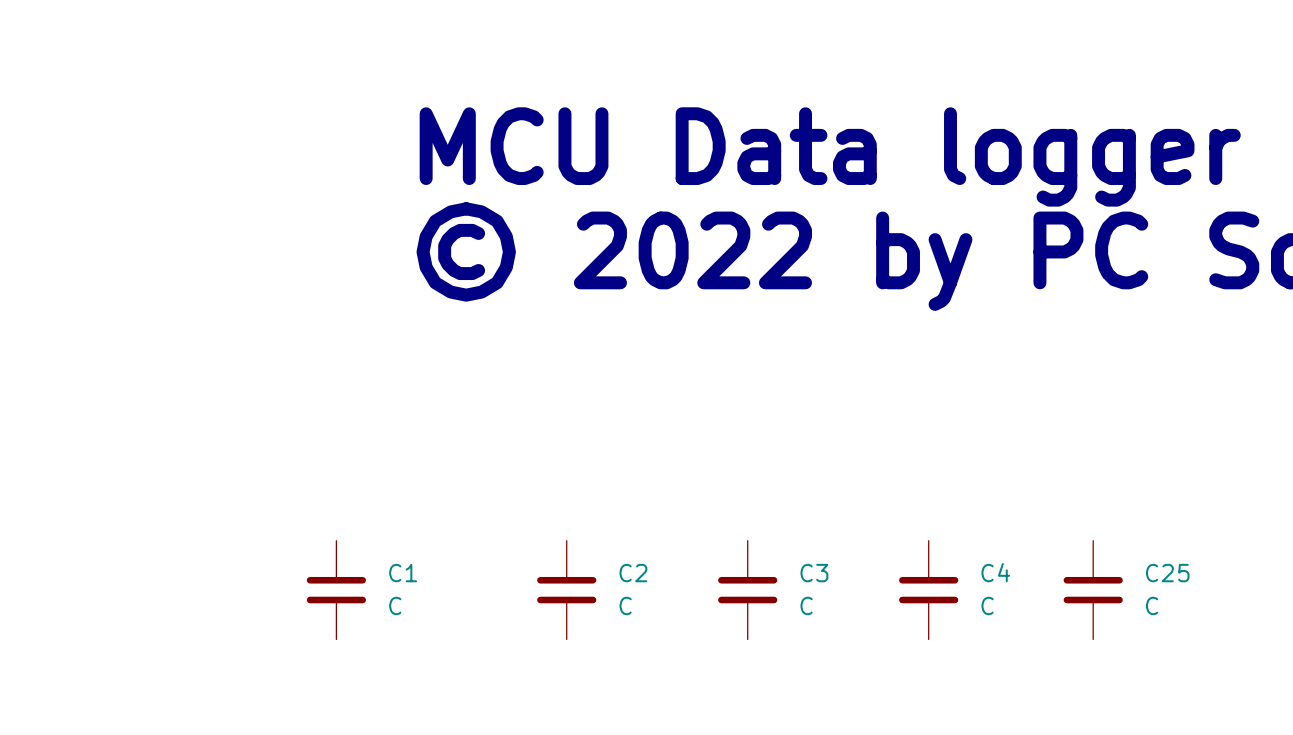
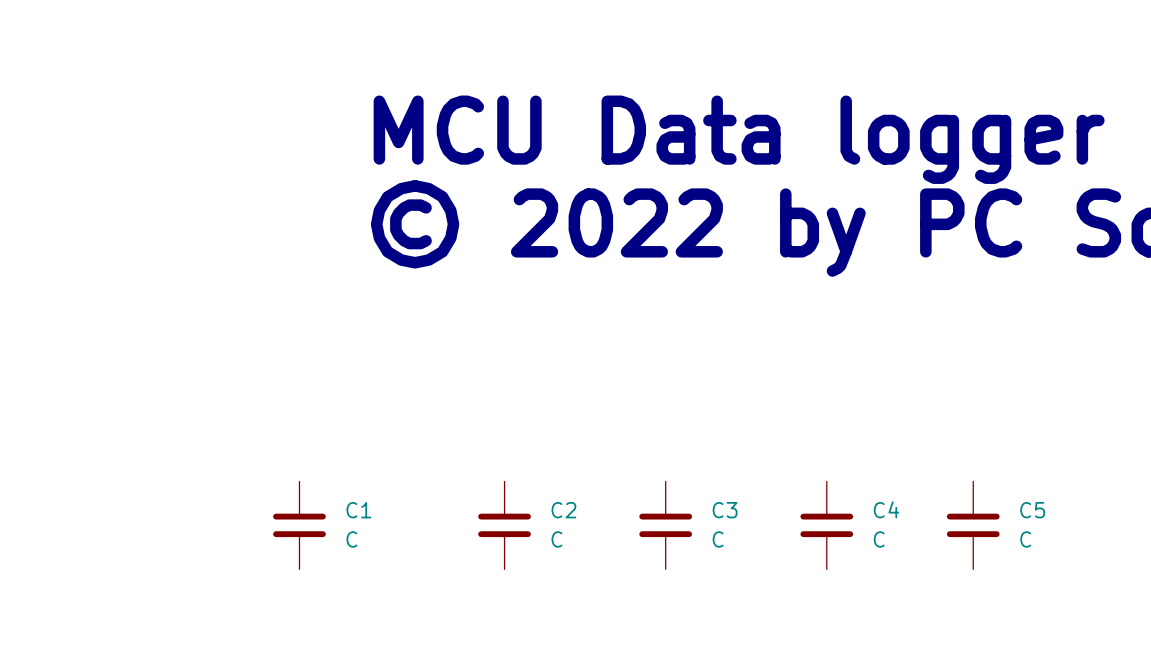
C25 name: C25 (1167, 573) -> C5 (1032, 510)

